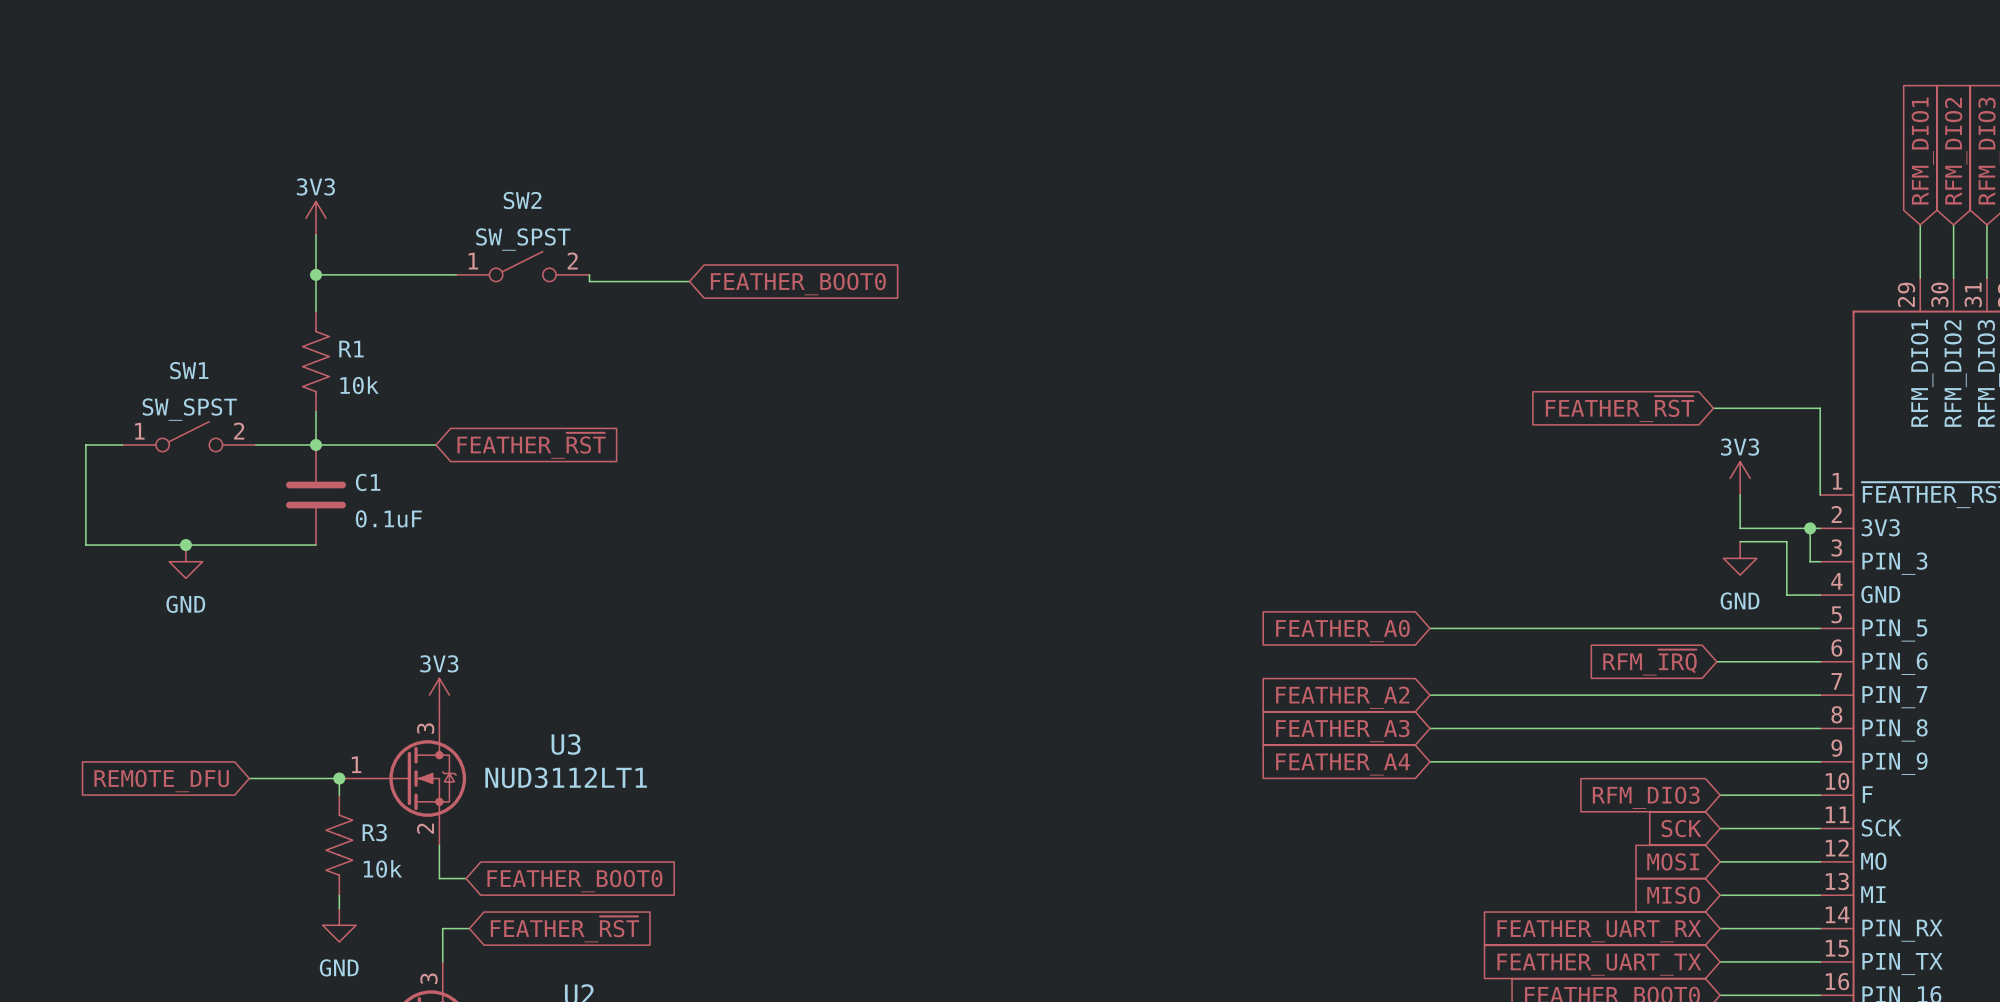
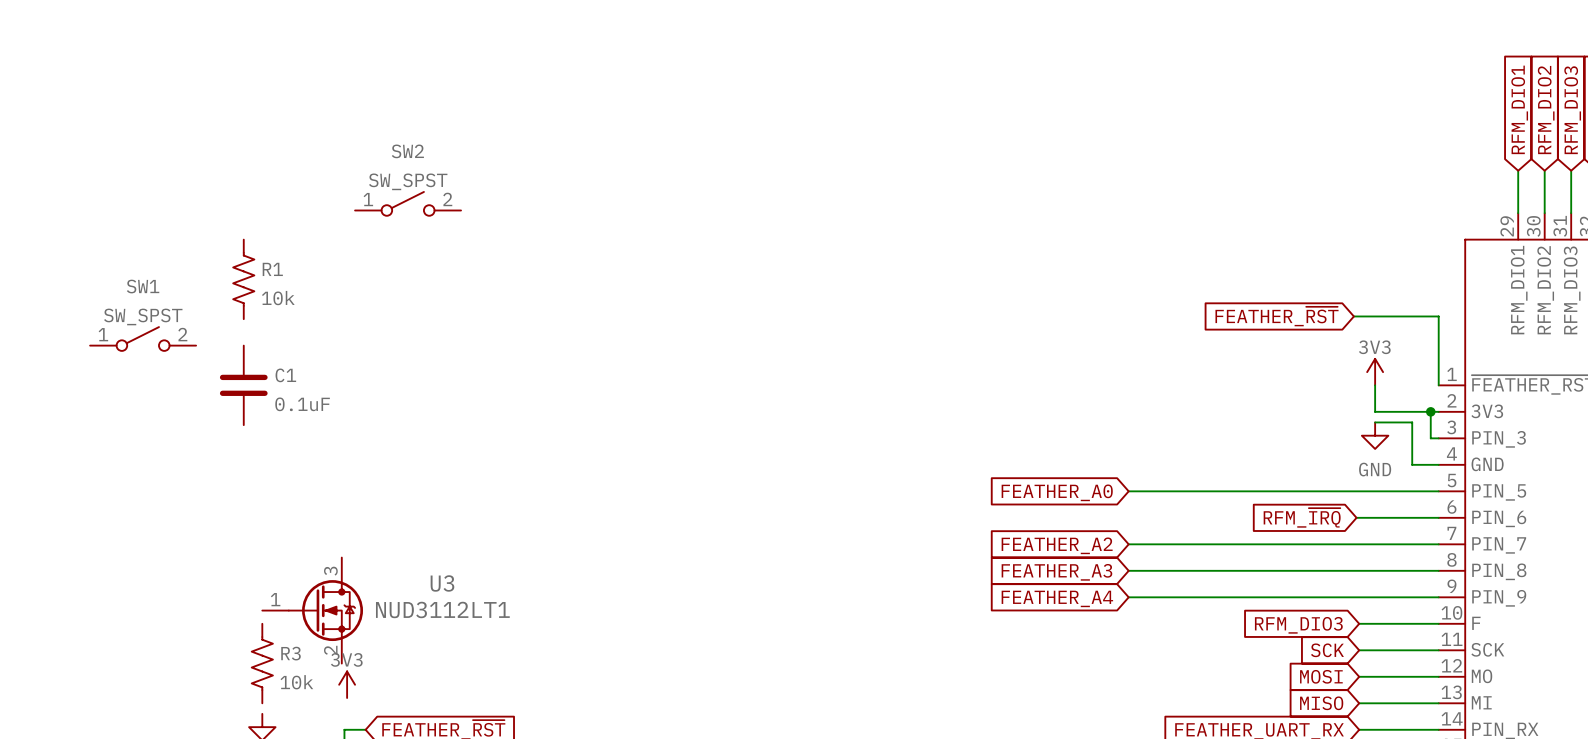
power symbol: 3V3 (316, 218) -> none
wire: (316, 234) (316, 311) -> none
wire: (316, 274) (456, 274) -> none
junction: (316, 274) -> none
wire: (589, 274) (589, 281) (689, 281) -> none
global label: FEATHER_BOOT0 (798, 284) -> none
wire: (316, 411) (316, 444) -> none
wire: (122, 444) (85, 444) (85, 545) (316, 545) -> none
wire: (255, 444) (436, 444) -> none
junction: (316, 444) -> none
global label: FEATHER_~{RST} (531, 445) -> none
junction: (185, 545) -> none
power symbol: GND (185, 561) -> none
power symbol position: 3V3 (439, 695) -> 3V3 (347, 684)
wire: (249, 778) (339, 778) (339, 795) -> none
junction: (339, 778) -> none
global label: REMOTE_DFU (161, 781) -> none
wire: (439, 845) (439, 878) (466, 878) -> none
global label: FEATHER_BOOT0 (574, 881) -> none
wire: (339, 895) (339, 908) -> none

